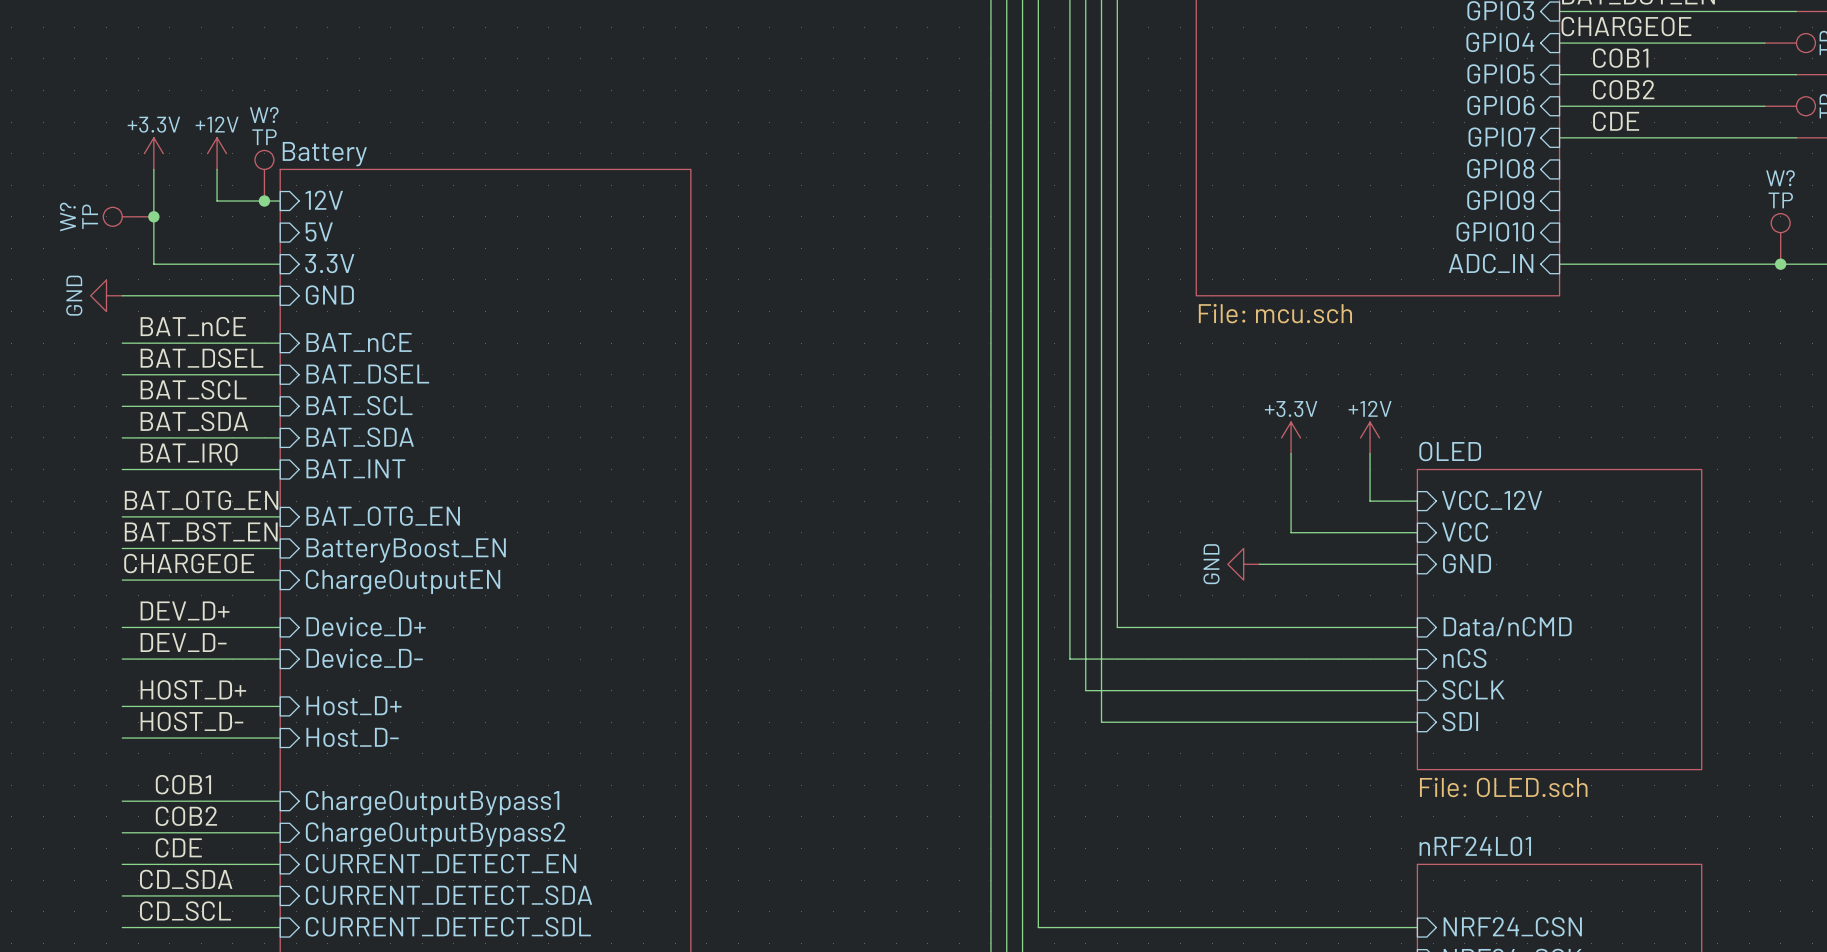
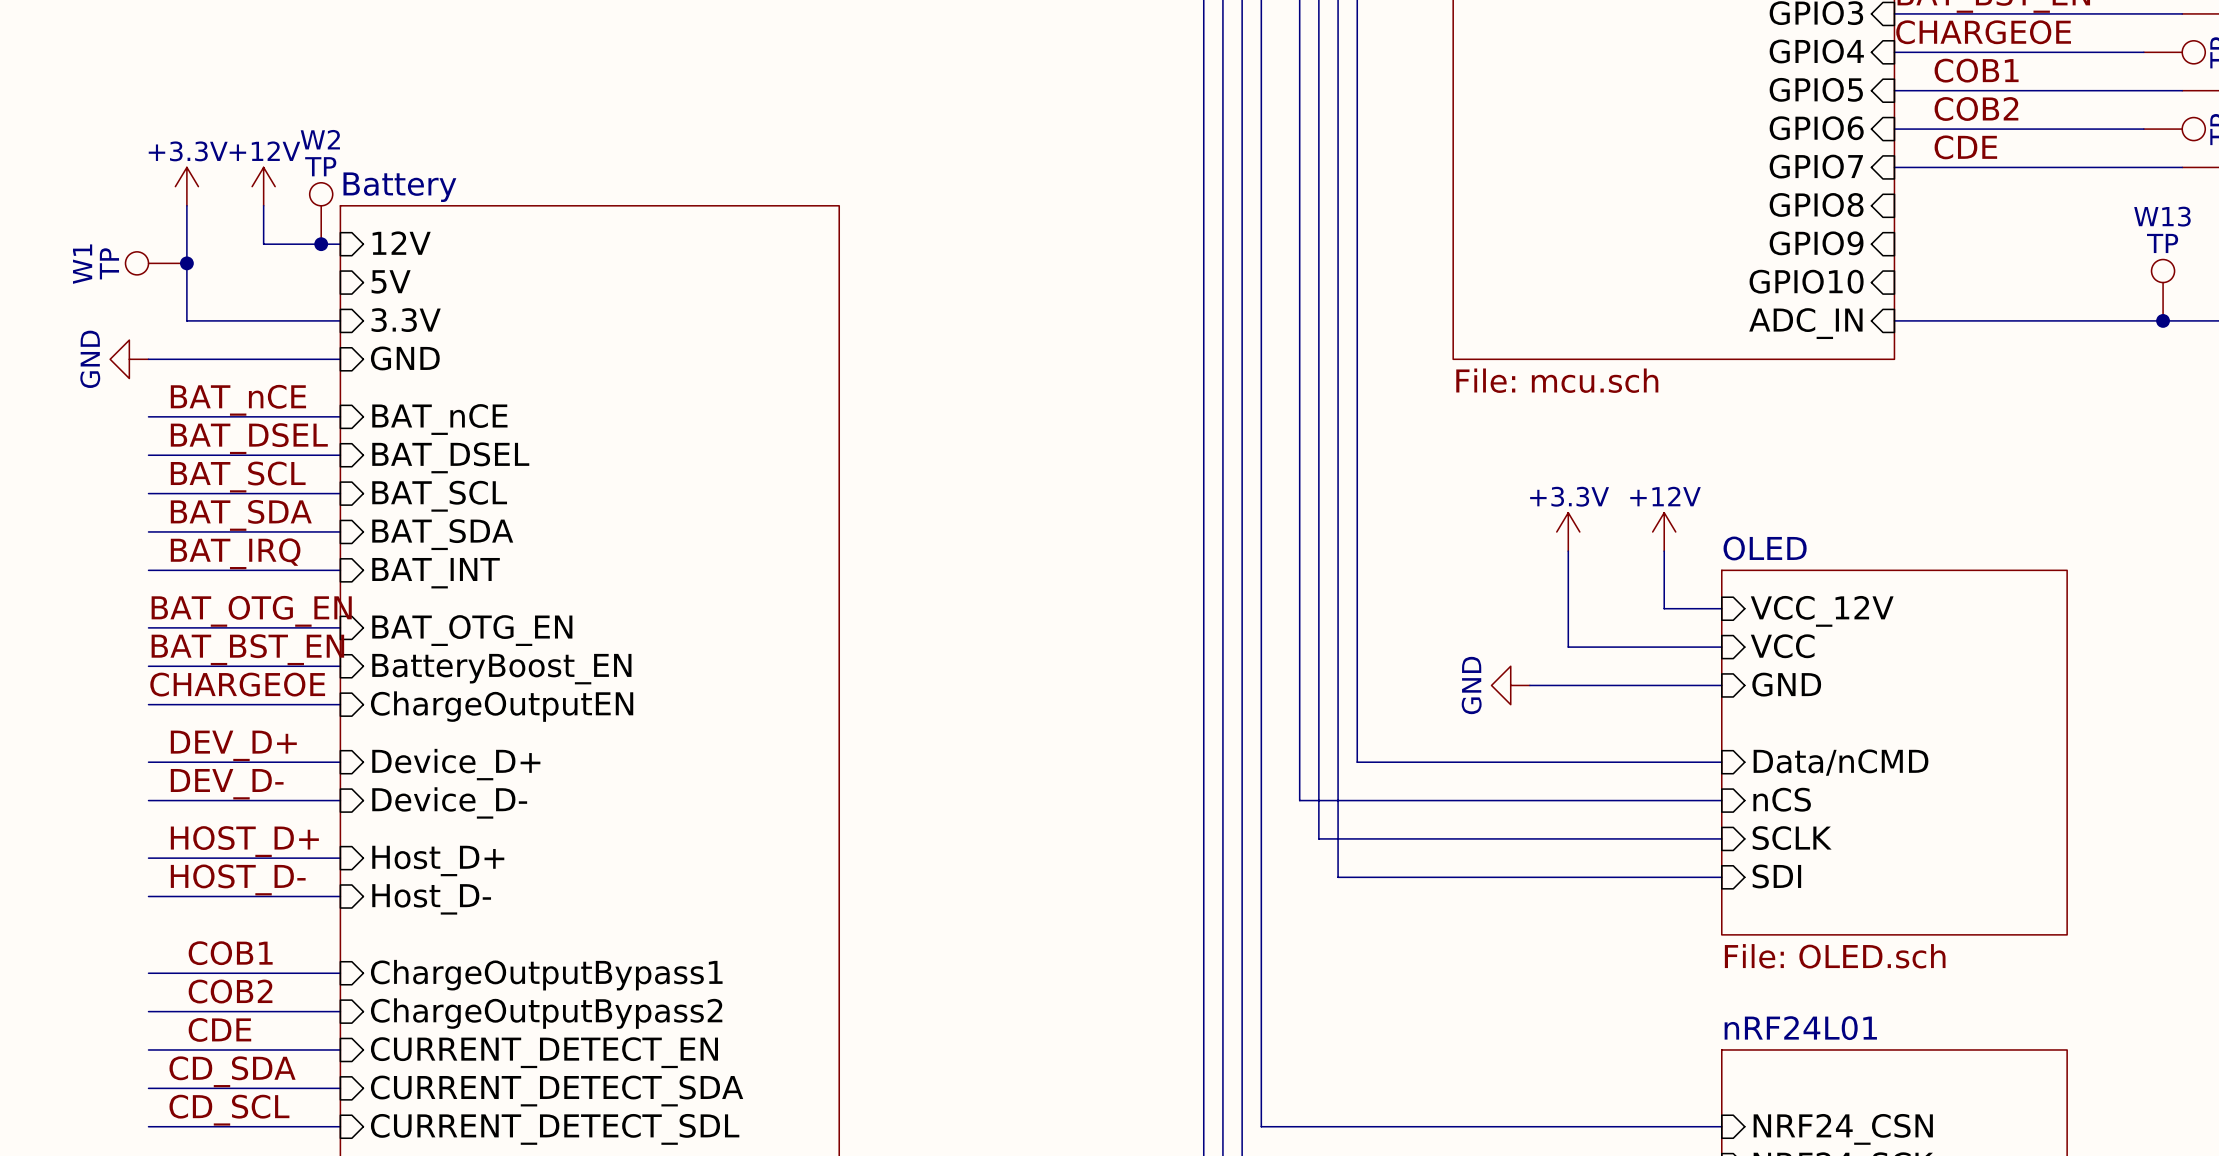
W? name: W? (264, 115) -> W2 (320, 139)
W? name: W? (1780, 178) -> W13 (2162, 216)
W? name: W? (67, 216) -> W1 (82, 264)

